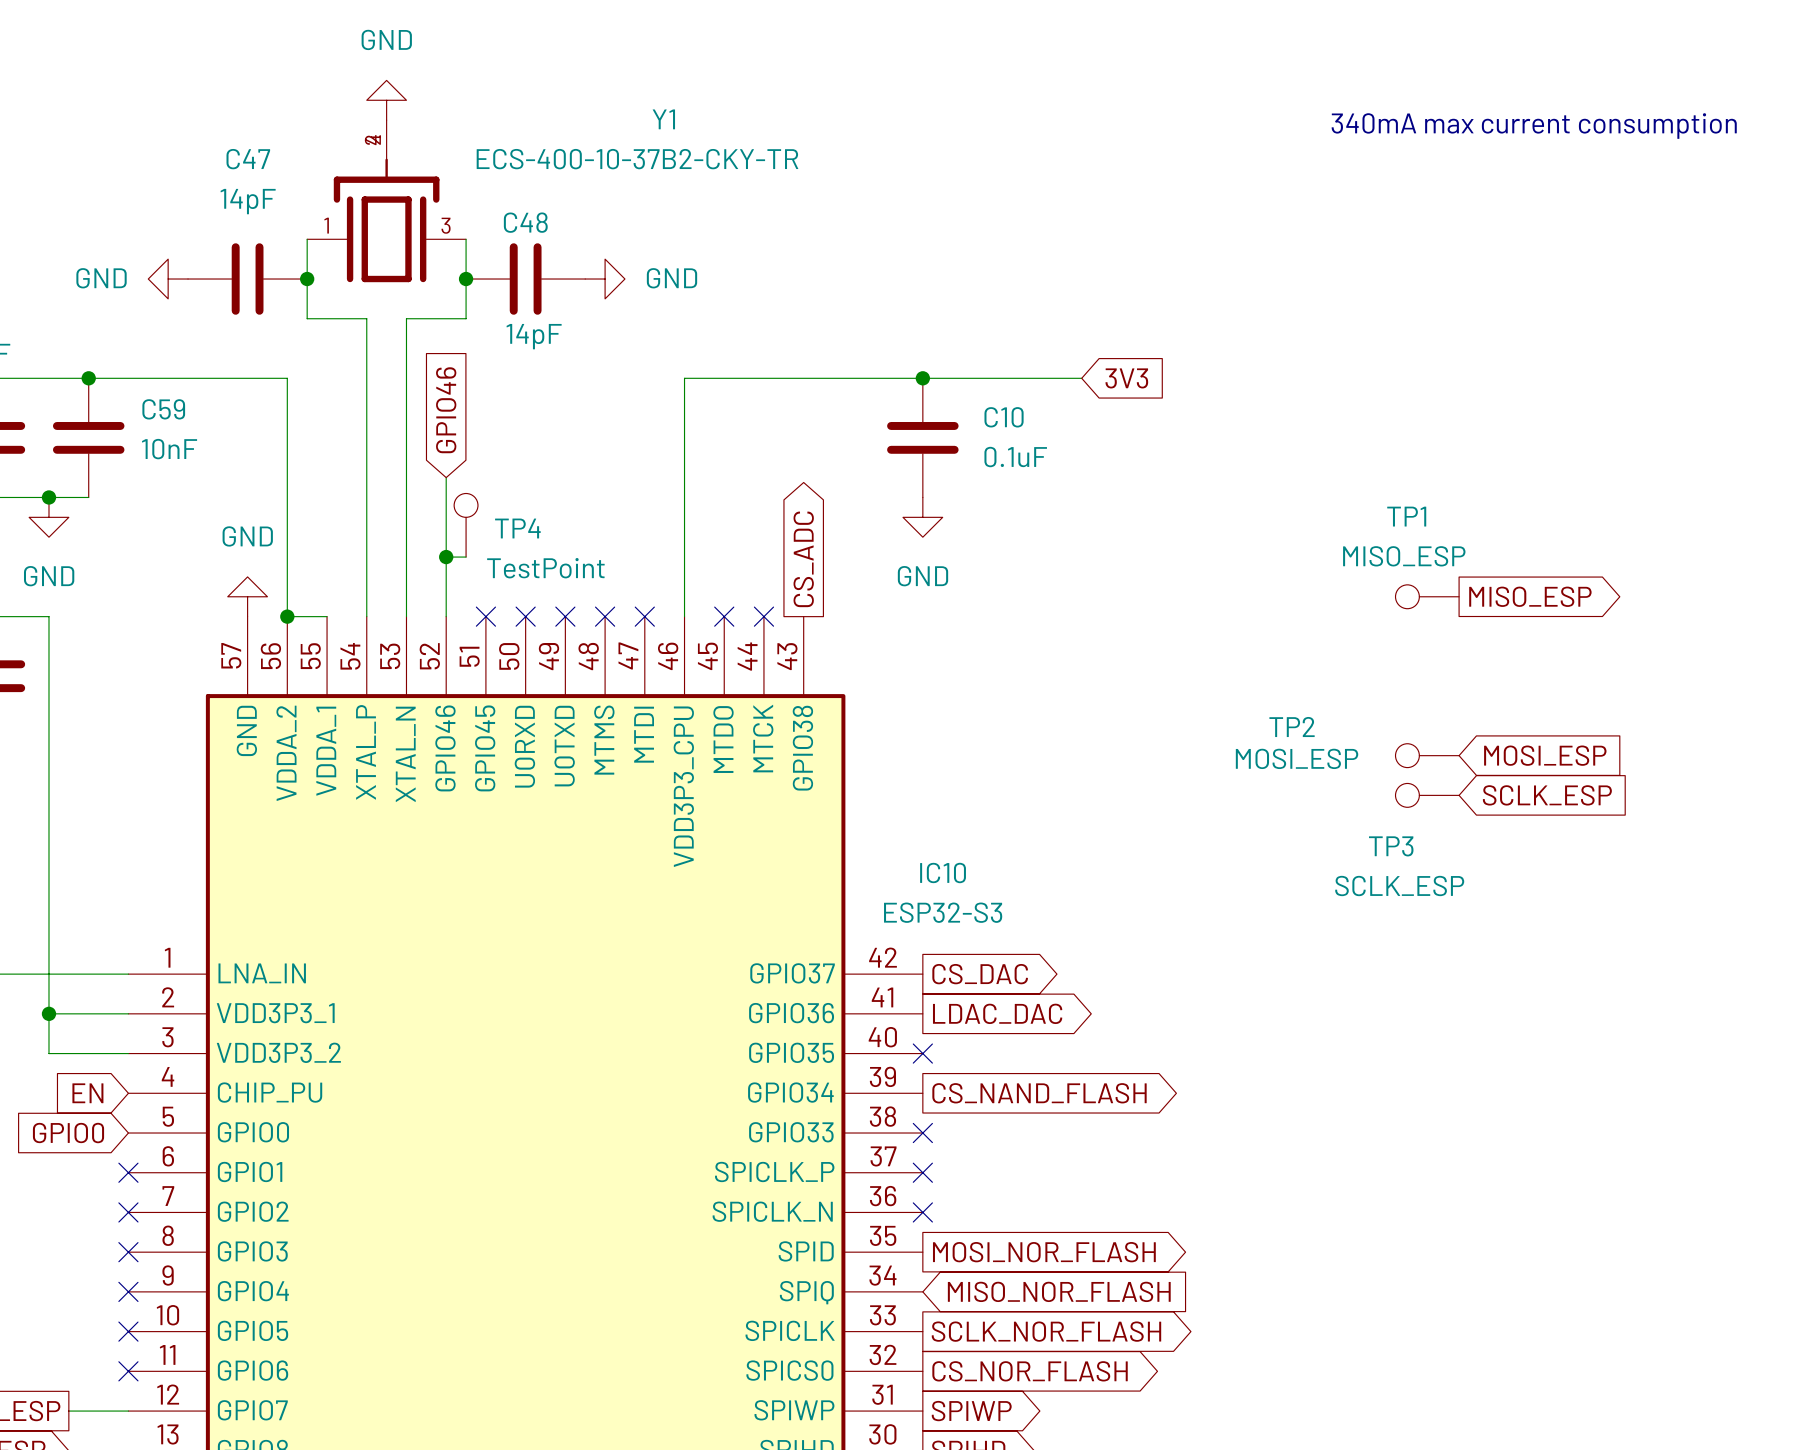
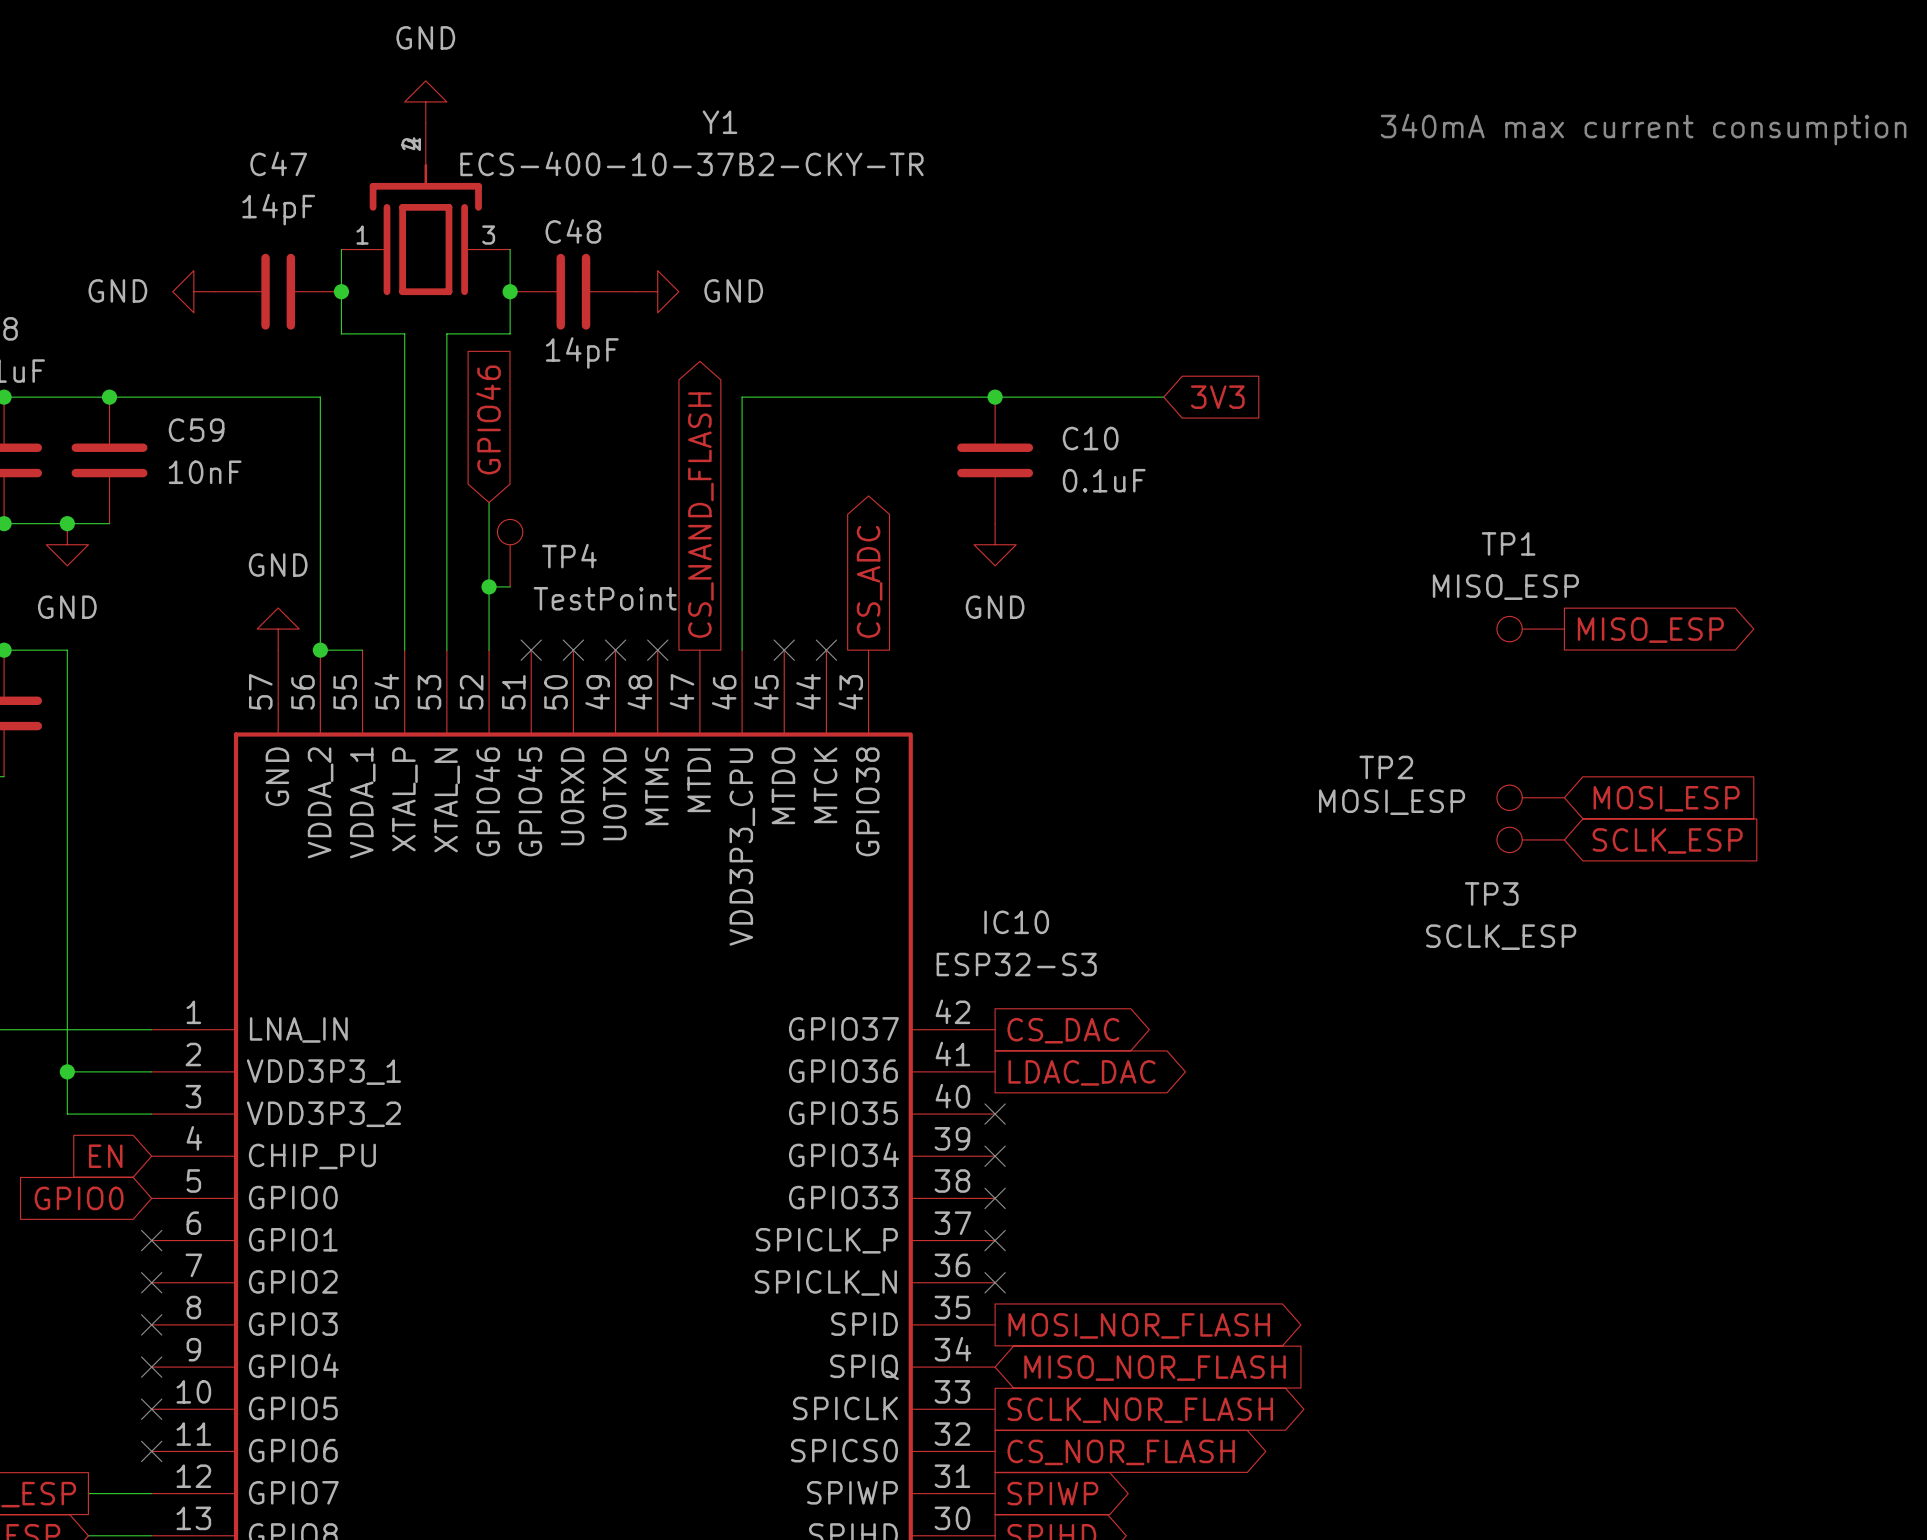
global label: none -> CS_NAND_FLASH (700, 515)
no-connect mark: (644, 616) -> none
no-connect mark: none -> (995, 1156)
global label: CS_NAND_FLASH (1039, 1093) -> none

